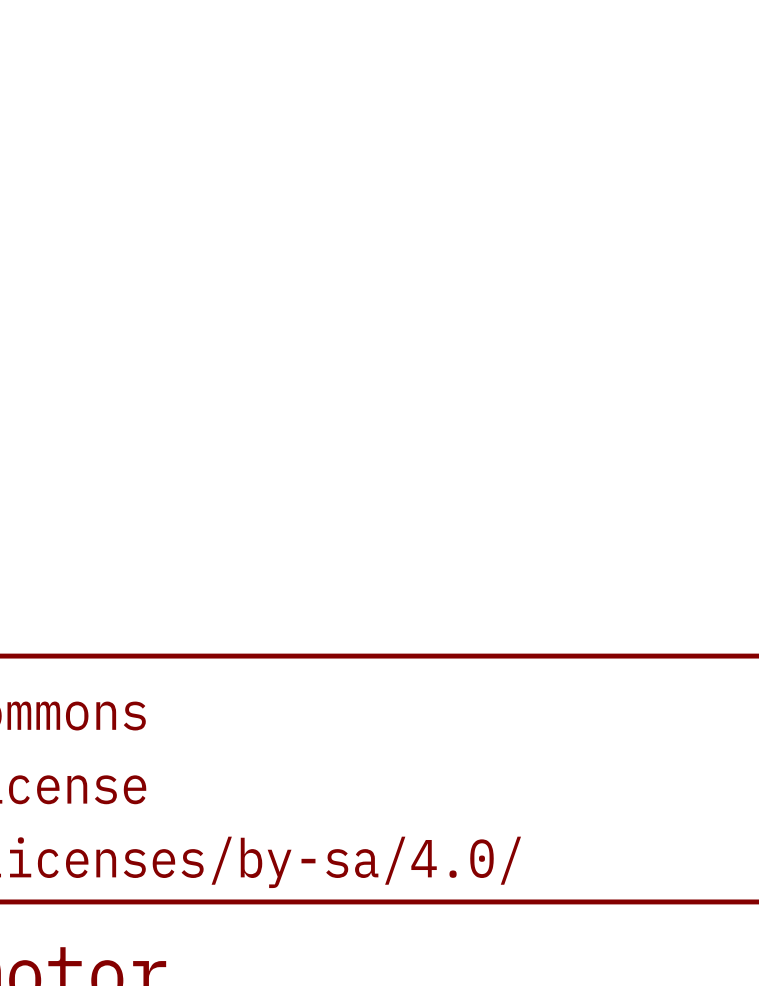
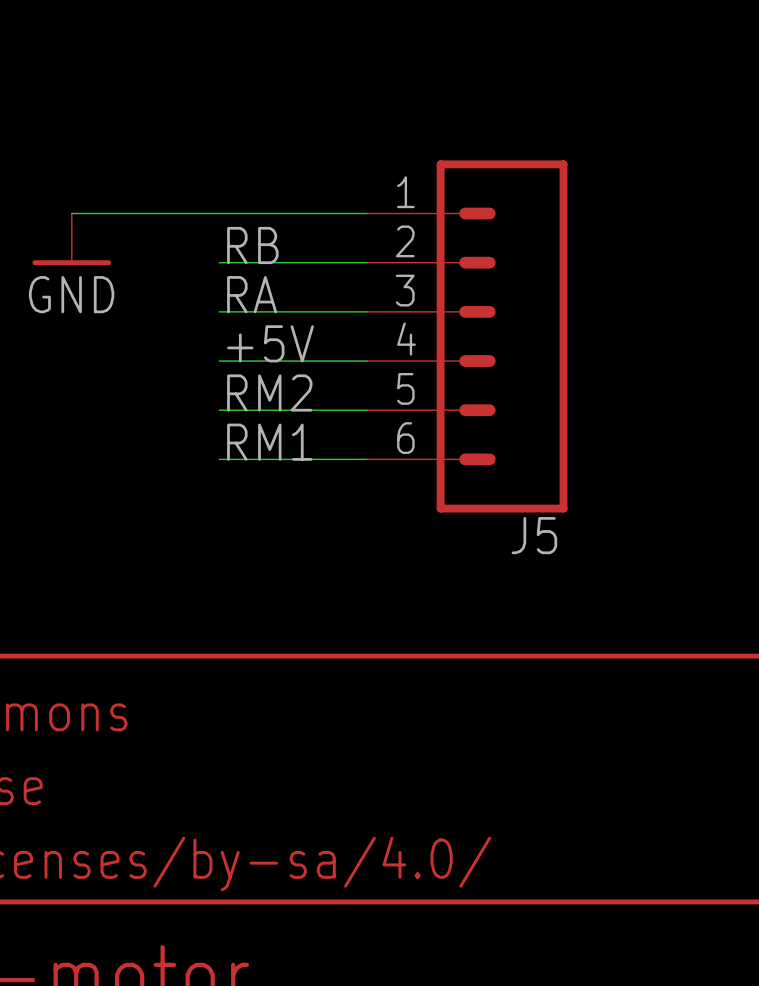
wire: none -> (71, 213) (366, 213)
power symbol: none -> GND (71, 239)
label: none -> RB (252, 245)
wire: none -> (219, 262) (366, 262)
label: none -> RA (252, 294)
wire: none -> (219, 311) (366, 311)
J5: none -> (467, 336)
label: none -> +5V (270, 343)
wire: none -> (219, 361) (366, 361)
label: none -> RM2 (269, 393)
wire: none -> (219, 410) (366, 410)
label: none -> RM1 (269, 442)
wire: none -> (219, 459) (366, 459)

